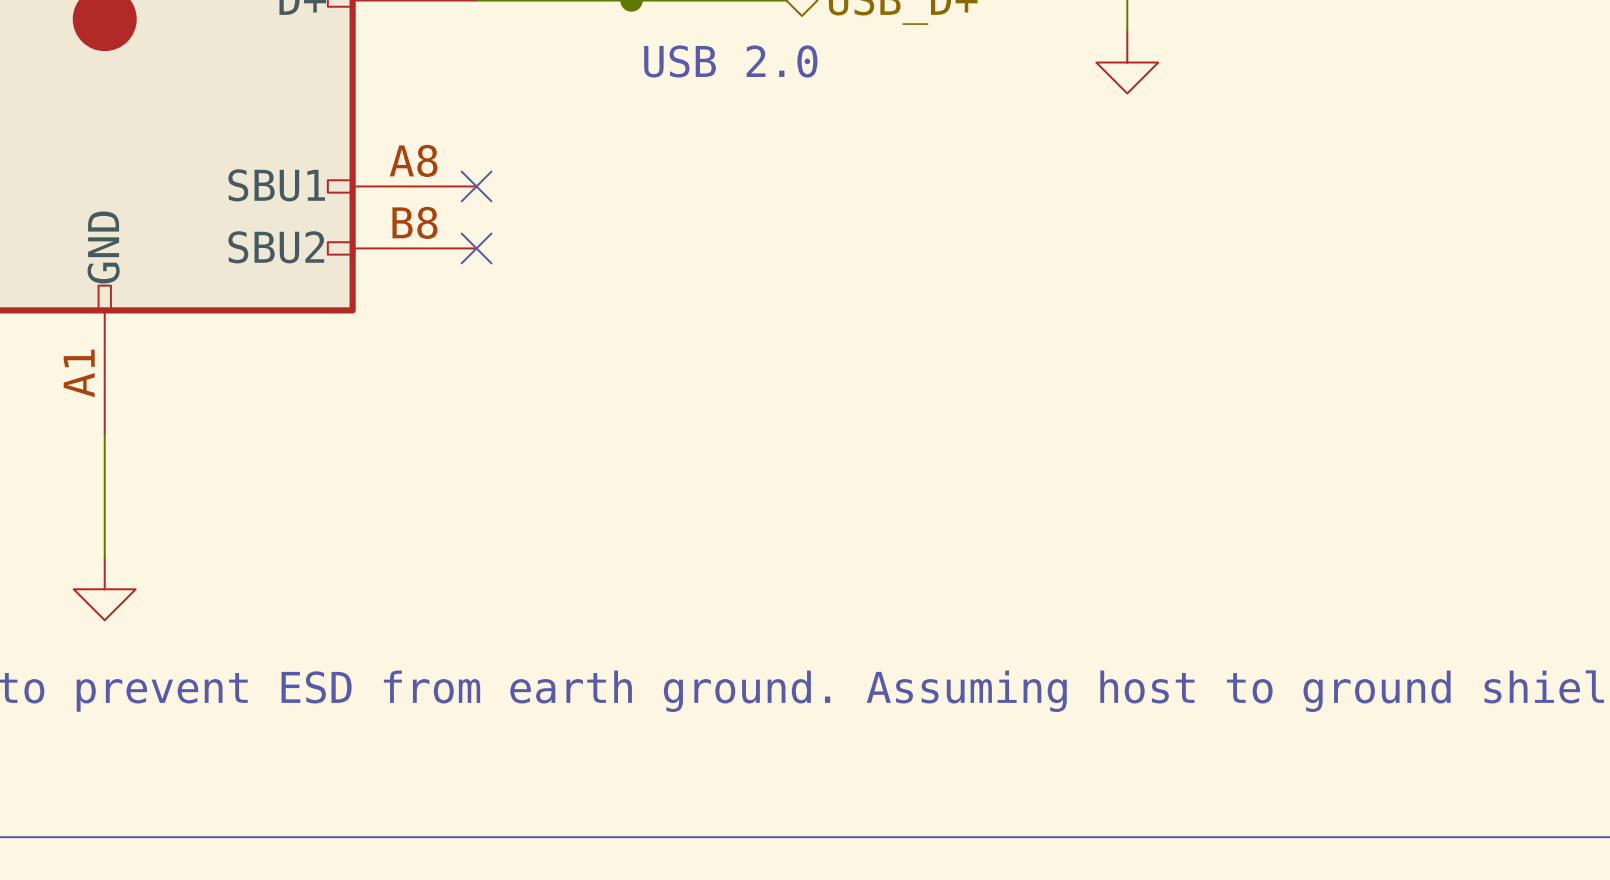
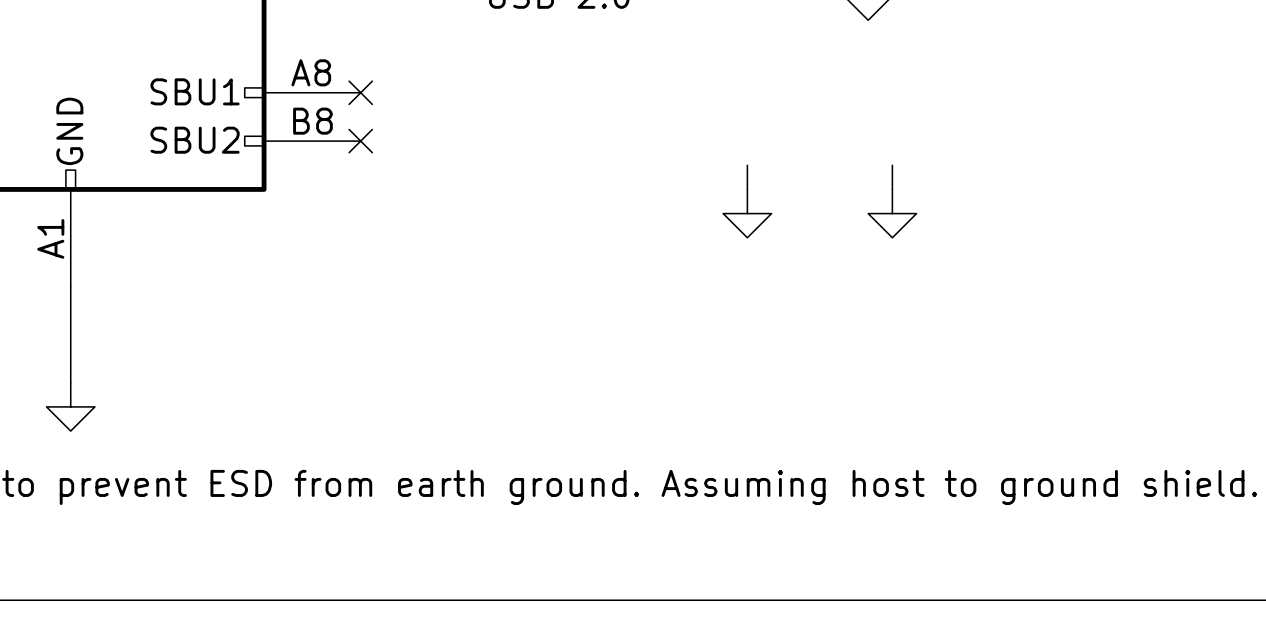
wire: none -> (747, 165) (747, 189)
wire: none -> (892, 165) (892, 189)
power symbol: none -> (747, 213)
power symbol: none -> (892, 213)

